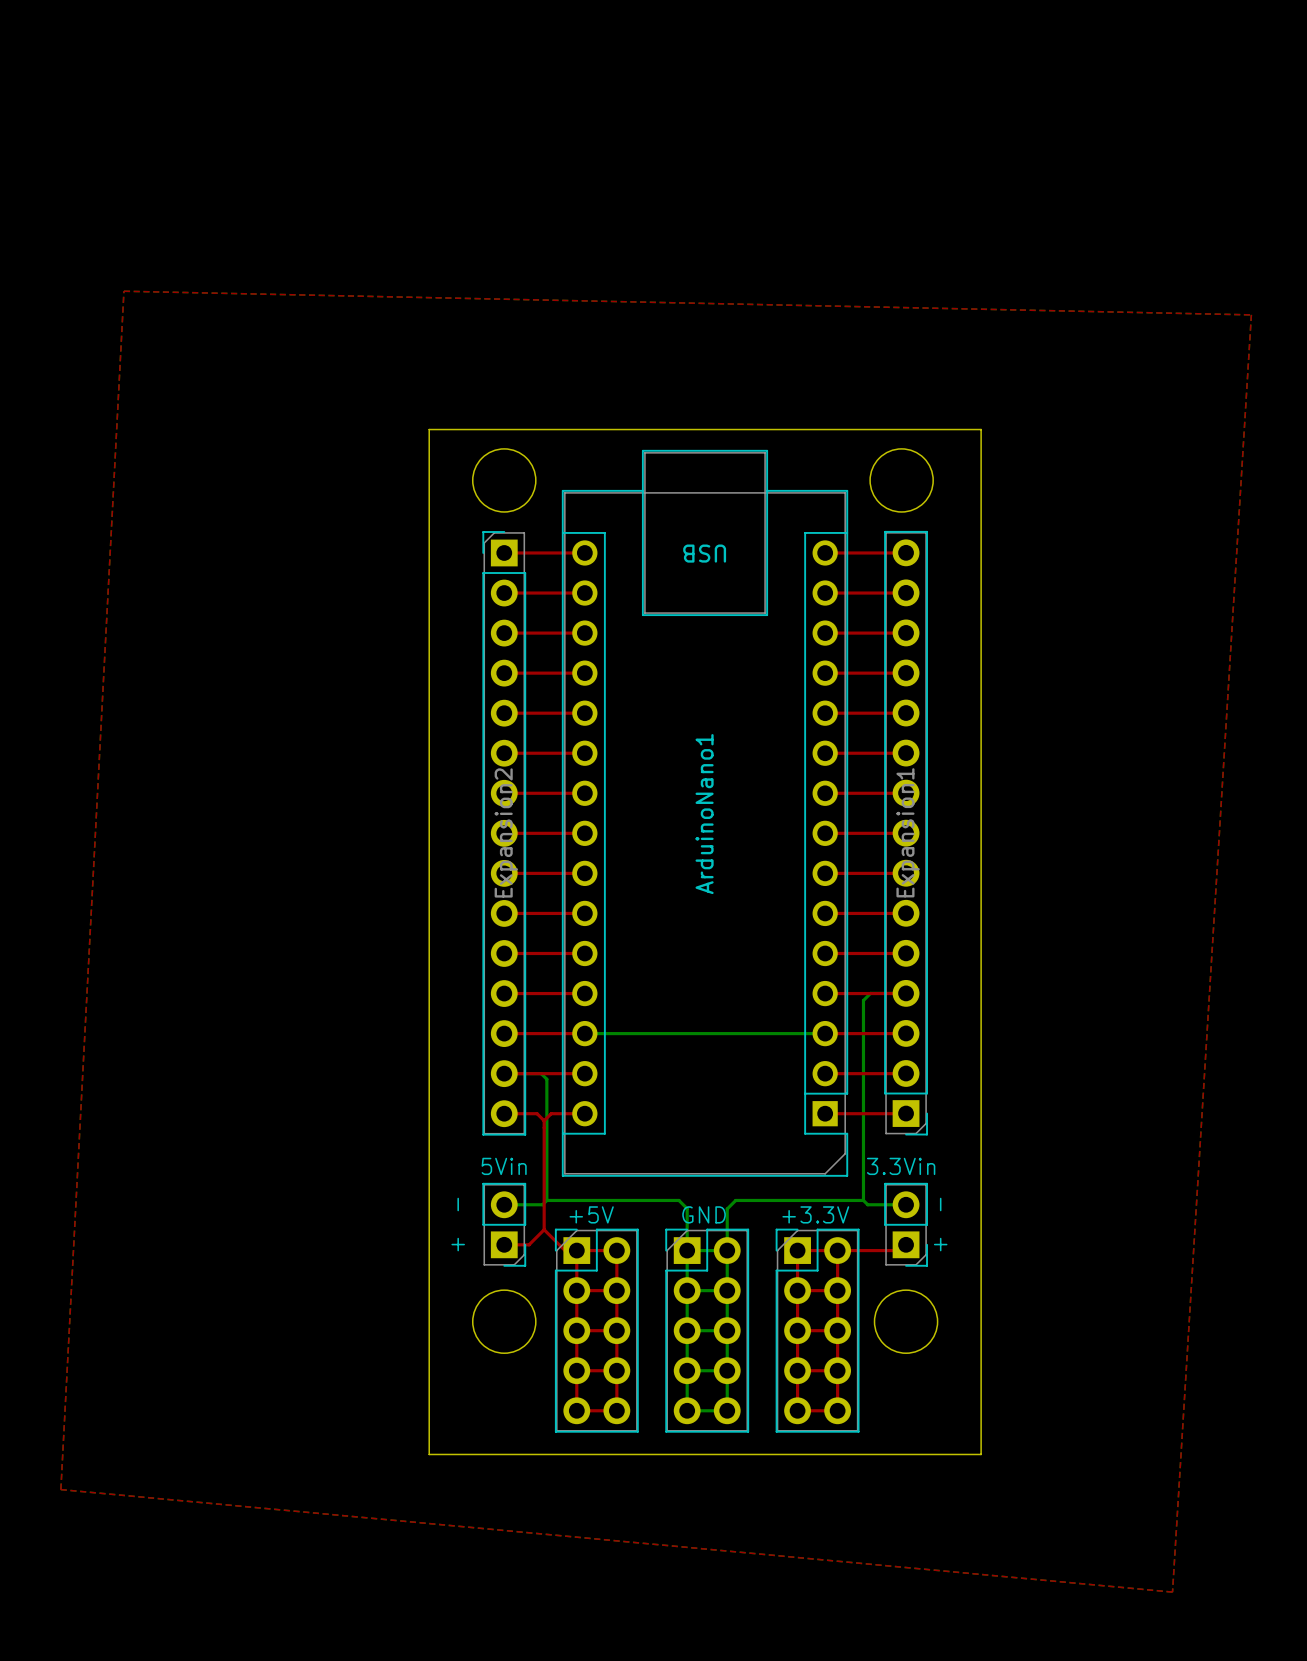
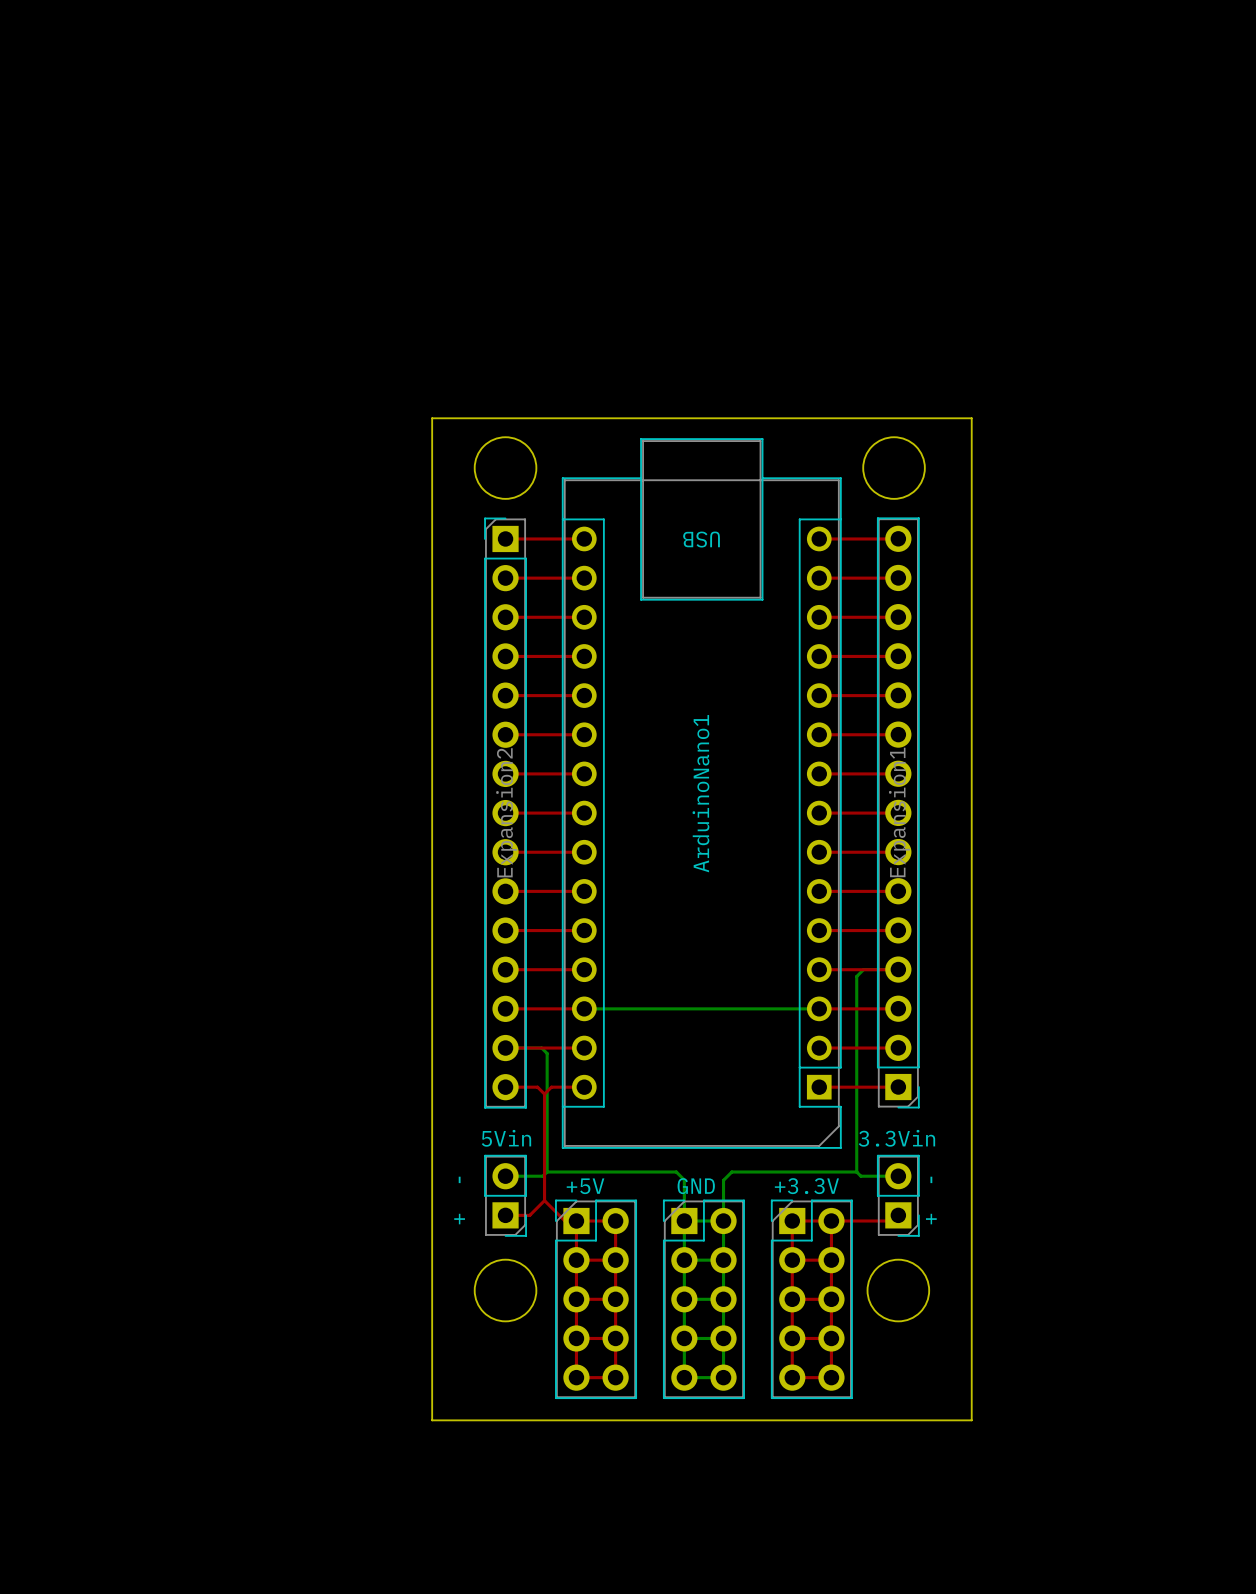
top zone outline: (123, 291) (1251, 314) (1172, 1592) (60, 1489) (123, 291) -> none

